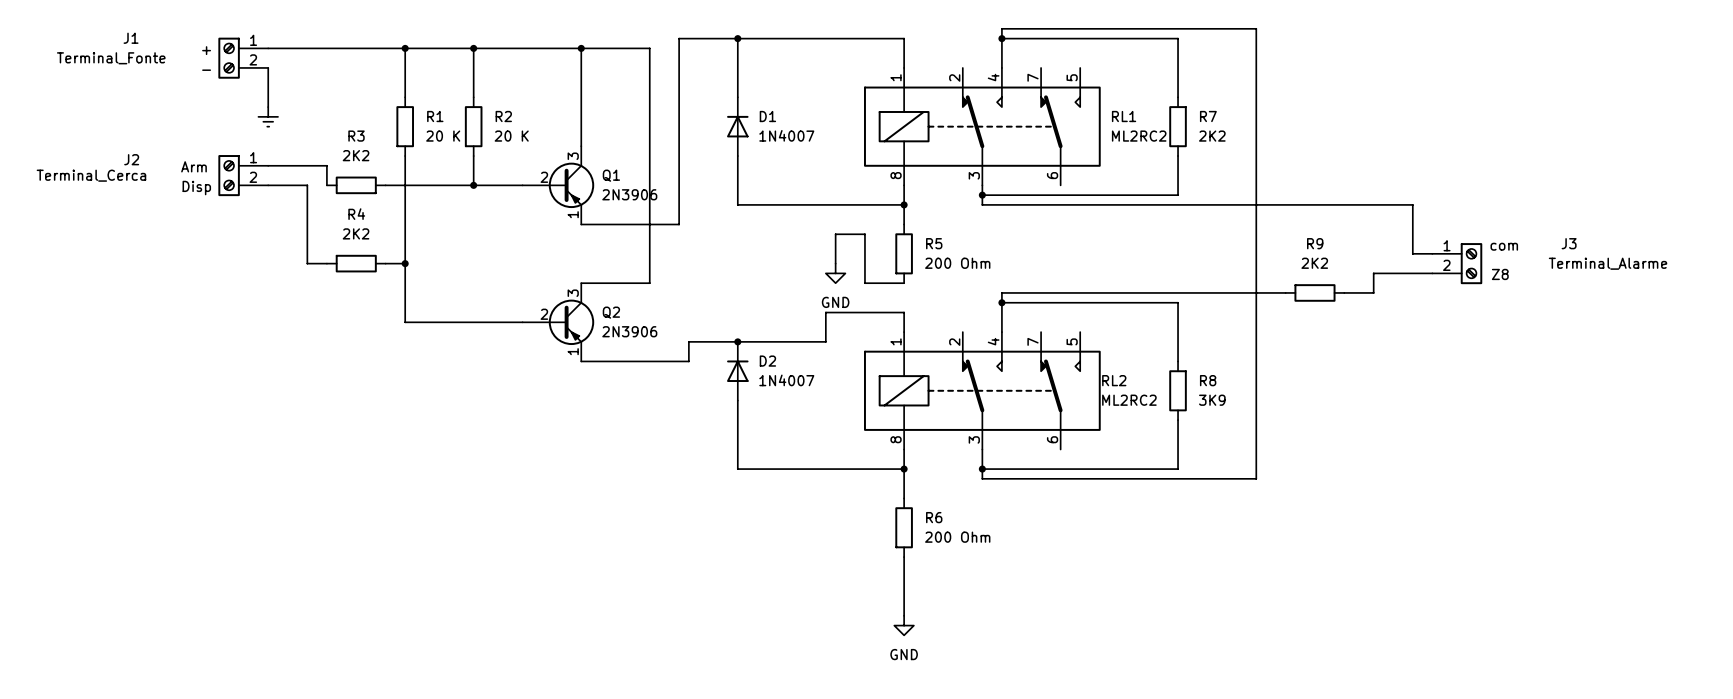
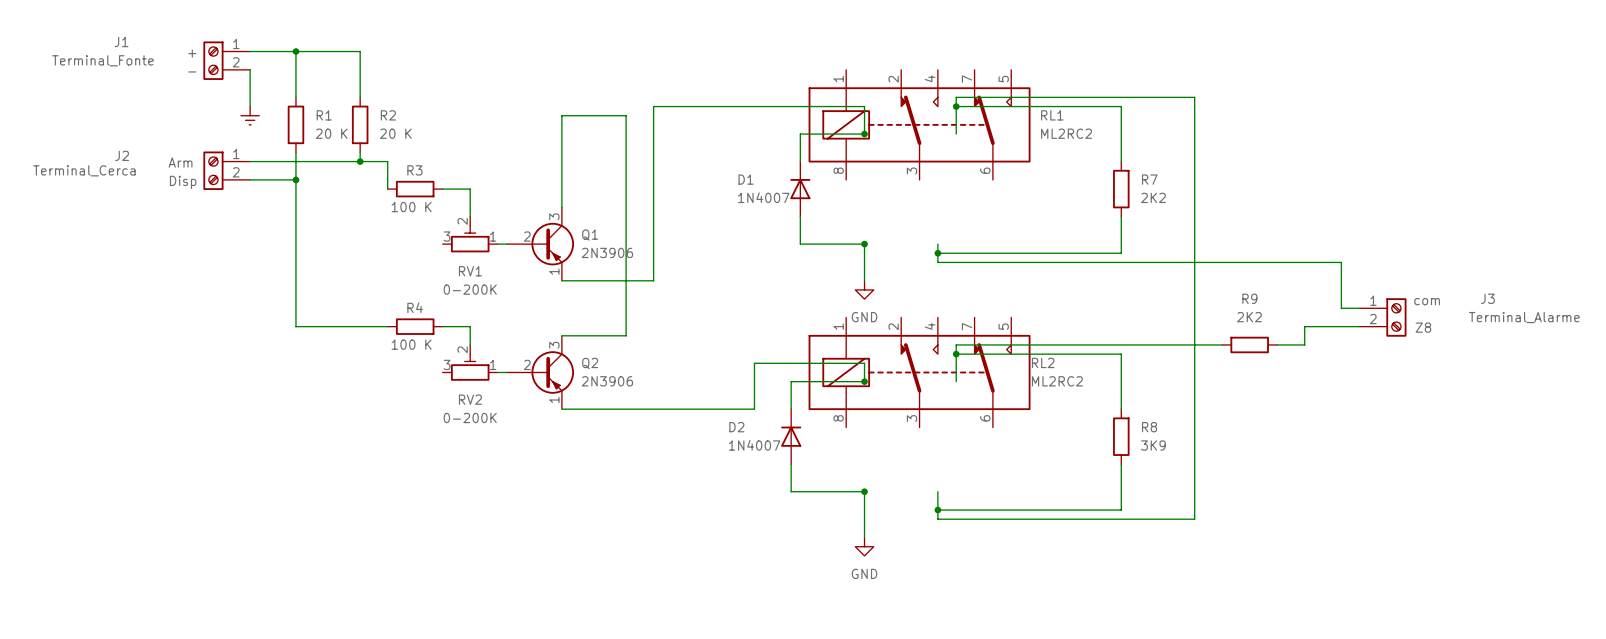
wire: (737, 38) (737, 97) -> none
junction: (737, 38) -> none
wire: (1001, 38) (1178, 38) (1178, 97) -> (956, 106) (1121, 106) (1121, 161)
junction: (1001, 38) -> none
junction: none -> (295, 51)
wire: (385, 48) (649, 48) (649, 283) (581, 283) -> (360, 51) (360, 97)
wire: (405, 48) (405, 97) -> (295, 51) (295, 97)
junction: (405, 48) -> none
wire: (473, 48) (473, 97) -> none
junction: (473, 48) -> none
wire: (581, 48) (581, 146) -> none
junction: (581, 48) -> none
wire: (904, 67) (904, 38) (679, 38) (679, 224) (581, 224) -> none
wire: (1001, 67) (1001, 28) (1256, 28) (1256, 478) (982, 478) (982, 449) -> (956, 134) (956, 97) (1194, 97) (1194, 519) (937, 519) (937, 491)
junction: none -> (956, 106)
D1 name position: D1 (767, 116) -> D1 (746, 179)
R1 position: (405, 126) -> (295, 124)
R2 position: (473, 126) -> (360, 124)
D1 position: (737, 126) -> (800, 189)
R7 position: (1178, 126) -> (1121, 189)
D1 value position: 1N4007 (786, 135) -> 1N4007 (763, 197)
R3 name position: R3 (356, 136) -> R3 (414, 170)
junction: none -> (864, 134)
R3 value: 2K2 (356, 155) -> 100 K (411, 207)
wire: none -> (295, 152) (295, 326) (387, 326)
wire: none -> (360, 152) (360, 161)
wire: (405, 156) (405, 322) (522, 322) -> none
wire: (473, 156) (473, 185) -> none
wire: (737, 156) (737, 204) (904, 204) -> none
wire: (1178, 156) (1178, 195) (982, 195) -> (1121, 216) (1121, 253) (937, 253)
wire: (326, 165) (326, 185) -> (305, 161) (387, 161) (387, 189)
junction: none -> (360, 161)
wire: none -> (800, 161) (800, 134) (864, 134) (864, 106) (653, 106) (653, 280) (561, 280)
wire: (307, 185) (307, 263) (326, 263) -> (286, 179) (295, 179)
junction: none -> (295, 179)
R3 position: (356, 185) -> (415, 189)
wire: (385, 185) (522, 185) -> none
junction: (473, 185) -> none
Q1 position: (558, 185) -> (540, 244)
wire: (904, 185) (904, 224) -> none
wire: (982, 185) (982, 204) (1412, 204) (1412, 253) (1432, 253) -> none
wire: none -> (442, 189) (470, 189) (470, 216)
junction: (982, 195) -> none
junction: (904, 204) -> none
R4 name position: R4 (356, 214) -> R4 (415, 307)
wire: none -> (561, 207) (561, 115) (626, 115) (626, 335) (561, 335)
wire: none -> (800, 216) (800, 244) (864, 244) (864, 280)
R4 value: 2K2 (356, 233) -> 100 K (411, 344)
RV1: none -> 0-200K (470, 234)
label position: com (1504, 246) -> com (1427, 301)
wire: none -> (497, 244) (506, 244)
R5: 200 Ohm (904, 253) -> none
junction: none -> (864, 244)
R4 position: (356, 263) -> (415, 326)
wire: (385, 263) (405, 263) -> none
junction: (405, 263) -> none
wire: (835, 263) (835, 234) (864, 234) (864, 283) (904, 283) -> none
junction: none -> (937, 253)
J3 position: (1457, 263) -> (1383, 317)
power symbol position: GND (835, 273) -> GND (864, 289)
wire: (1373, 273) (1373, 292) (1344, 292) -> (1286, 262) (937, 262) (937, 244)
wire: none -> (1341, 262) (1341, 308) (1359, 308)
label position: Z8 (1500, 274) -> Z8 (1423, 327)
wire: (1285, 292) (1001, 292) (1001, 332) -> (1222, 344) (956, 344) (956, 381)
R9 position: (1314, 292) -> (1249, 344)
wire: (1001, 302) (1178, 302) (1178, 361) -> (956, 354) (1121, 354) (1121, 409)
junction: (1001, 302) -> none
Q2 position: (558, 322) -> (540, 372)
wire: (904, 332) (904, 312) (825, 312) (825, 341) (688, 341) (688, 361) (581, 361) -> none
wire: none -> (442, 326) (470, 326) (470, 344)
junction: (737, 341) -> none
wire: none -> (1359, 326) (1304, 326) (1304, 344) (1277, 344)
D2 name position: D2 (767, 361) -> D2 (736, 427)
D2 position: (737, 371) -> (791, 436)
junction: none -> (956, 354)
RV2: none -> 0-200K (470, 362)
D2 value position: 1N4007 (786, 380) -> 1N4007 (754, 445)
wire: none -> (497, 372) (506, 372)
R8 position: (1178, 390) -> (1121, 436)
wire: (737, 400) (737, 469) (904, 469) -> none
junction: none -> (864, 381)
wire: (1178, 420) (1178, 469) (982, 469) -> (1121, 464) (1121, 510) (937, 510)
wire: none -> (561, 409) (754, 409) (754, 363) (864, 363) (864, 381) (791, 381) (791, 409)
wire: (904, 449) (904, 498) -> none
junction: (904, 469) -> none
junction: (982, 469) -> none
wire: none -> (791, 464) (791, 491) (864, 491) (864, 537)
junction: none -> (864, 491)
R6: 200 Ohm (904, 527) -> none
junction: none -> (937, 510)
wire: (904, 557) (904, 615) -> none
power symbol position: GND (904, 625) -> GND (864, 546)

